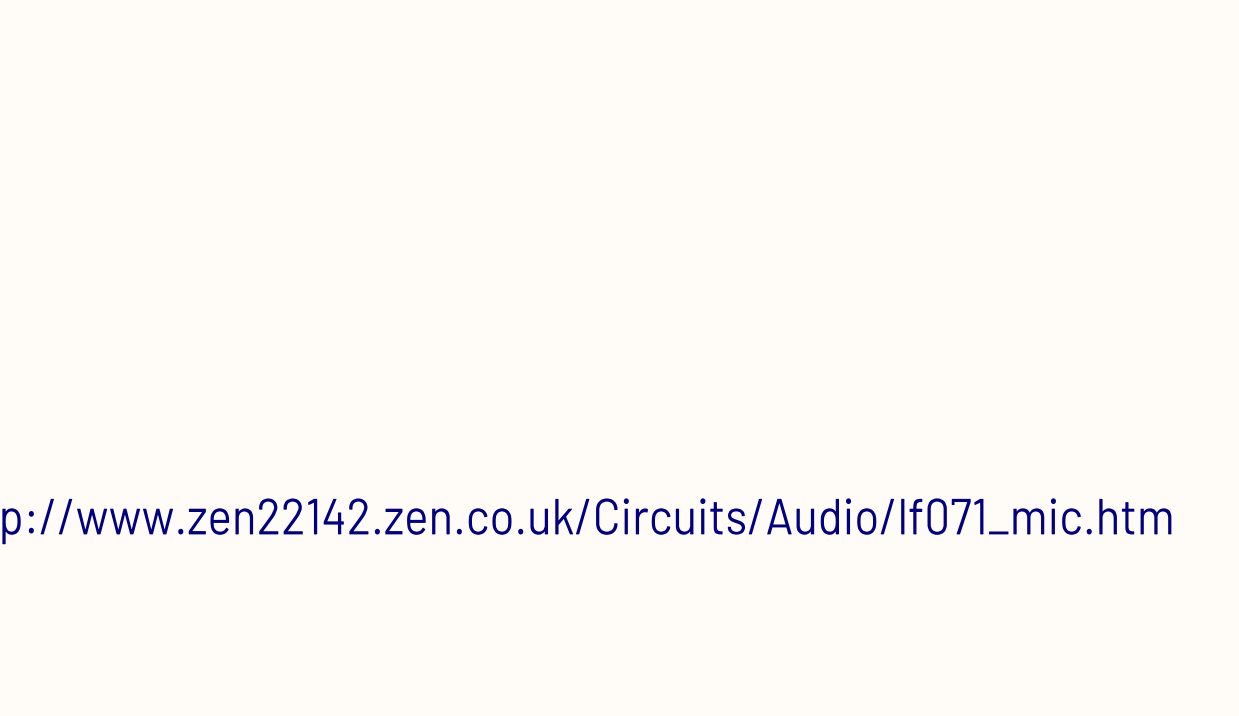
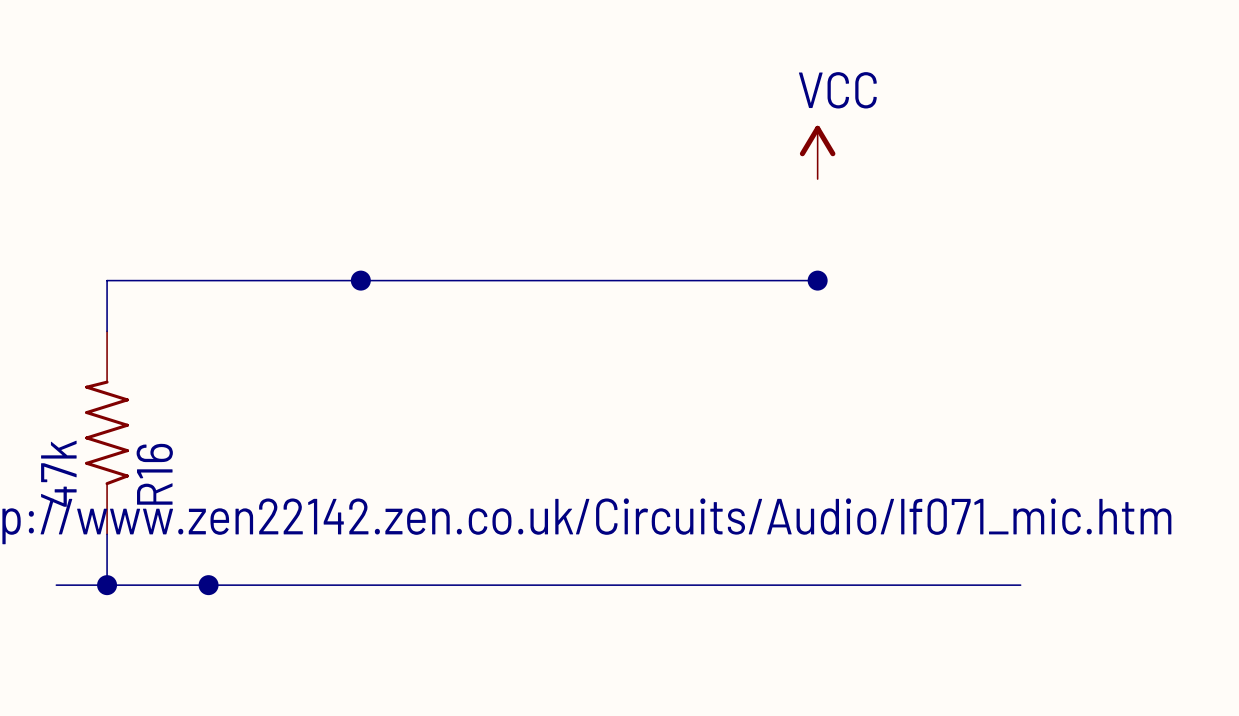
power symbol: none -> VCC (817, 152)
junction: none -> (360, 280)
wire: none -> (817, 280) (107, 280) (107, 331)
junction: none -> (817, 280)
R16: none -> 47k (107, 432)
wire: none -> (107, 534) (107, 585)
wire: none -> (56, 585) (1020, 585)
junction: none -> (107, 585)
junction: none -> (208, 585)

